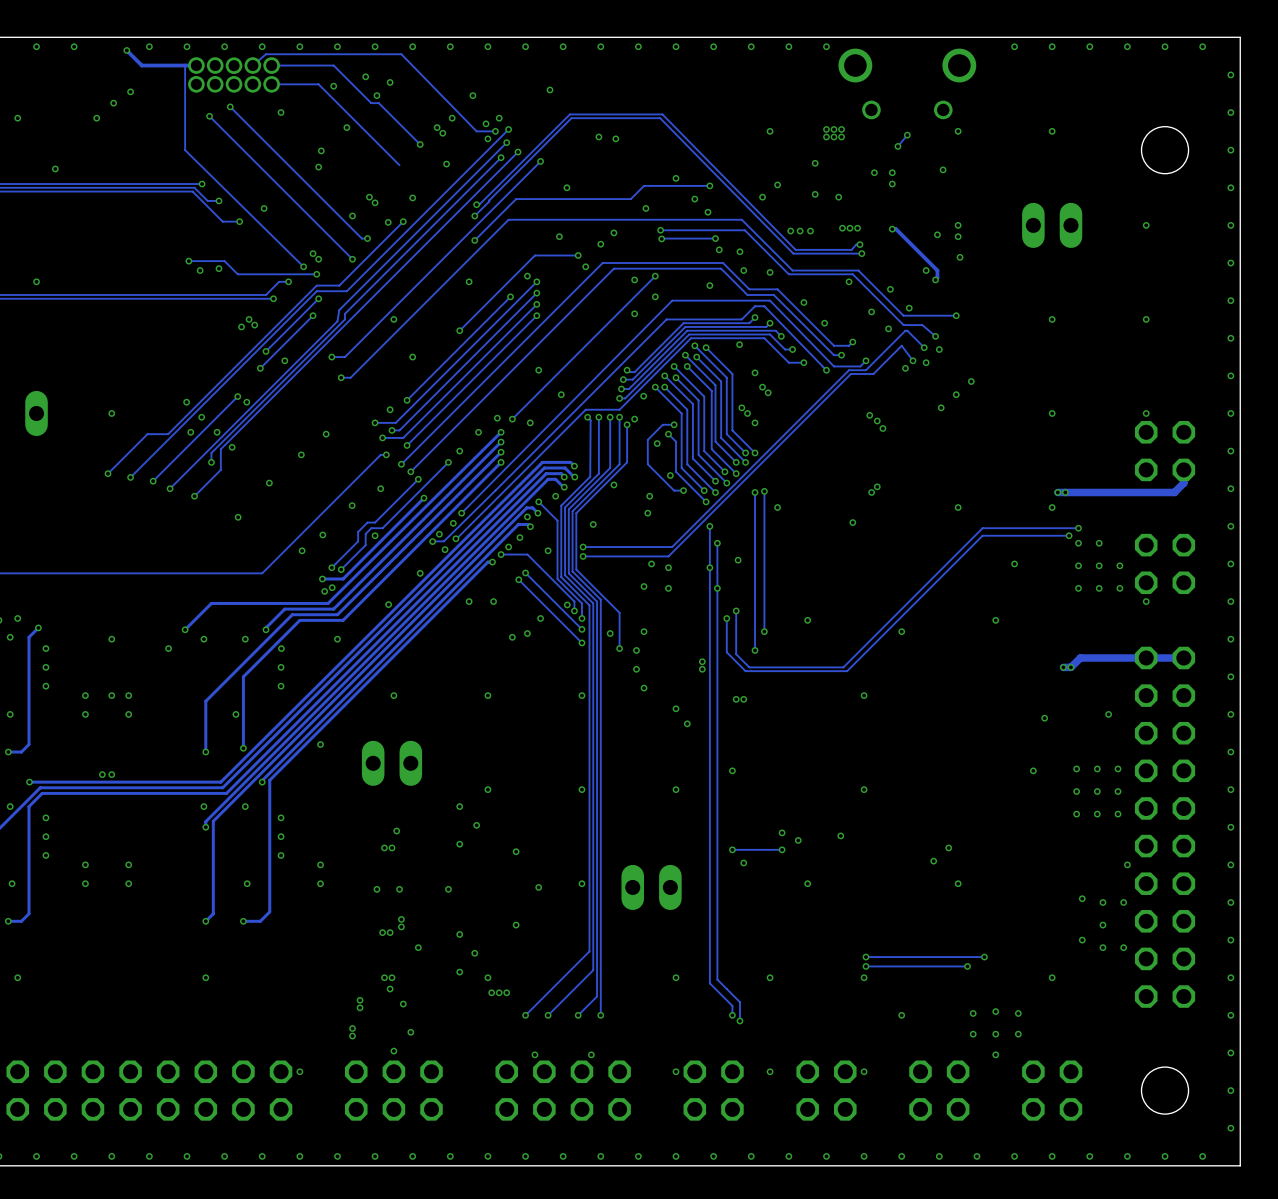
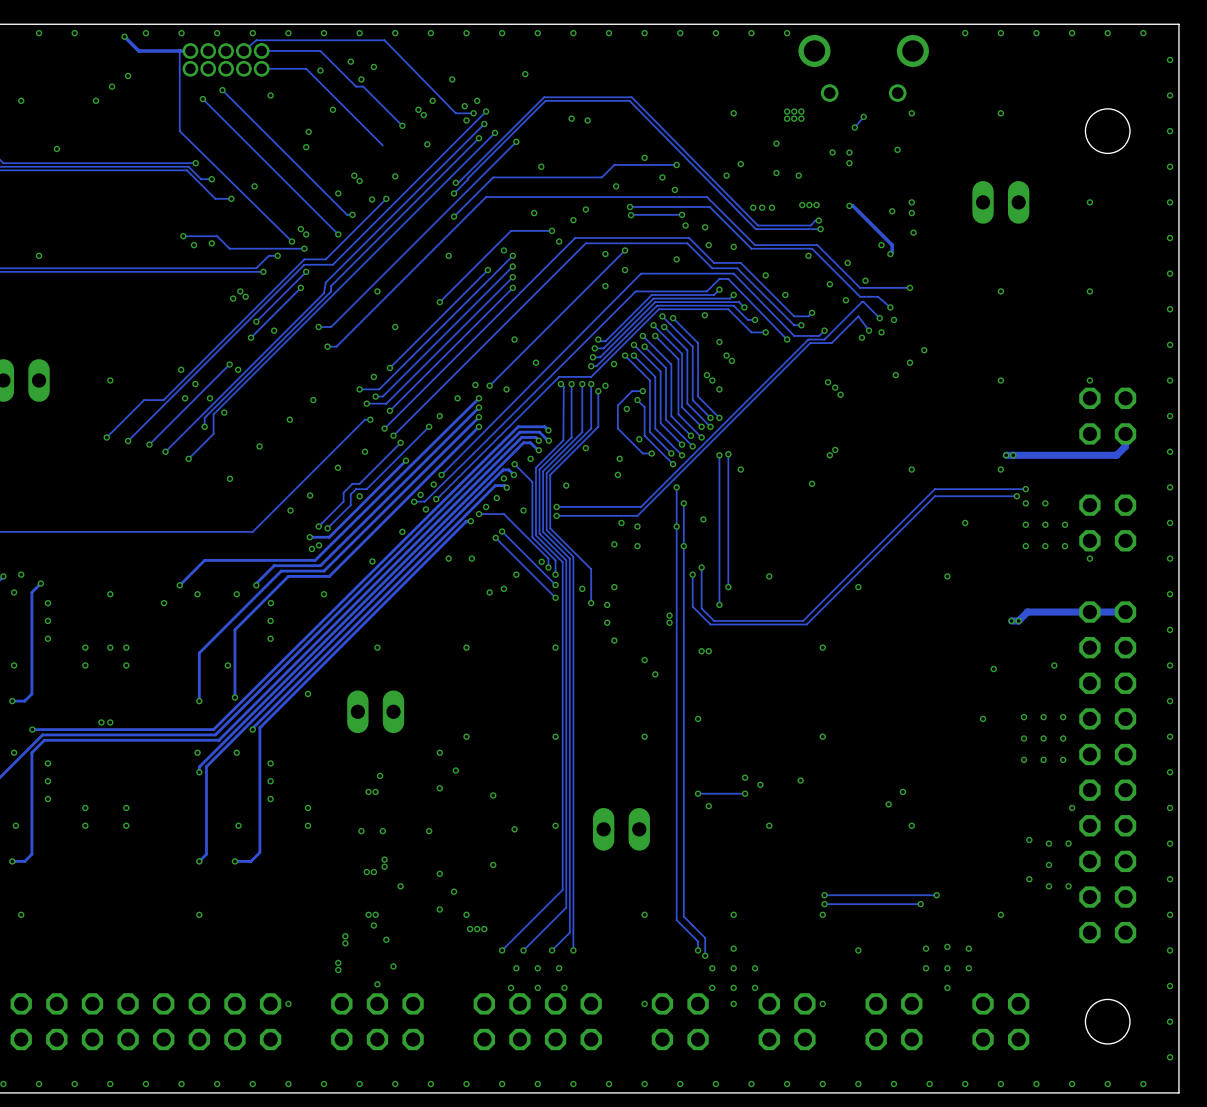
via: none -> (733, 948)
via: none -> (516, 968)
via: none -> (537, 968)
via: none -> (559, 968)
via: none -> (712, 968)
via: none -> (733, 968)
via: none -> (755, 968)
via: none -> (537, 987)
via: none -> (712, 987)
via: none -> (733, 987)
via: none -> (755, 987)

